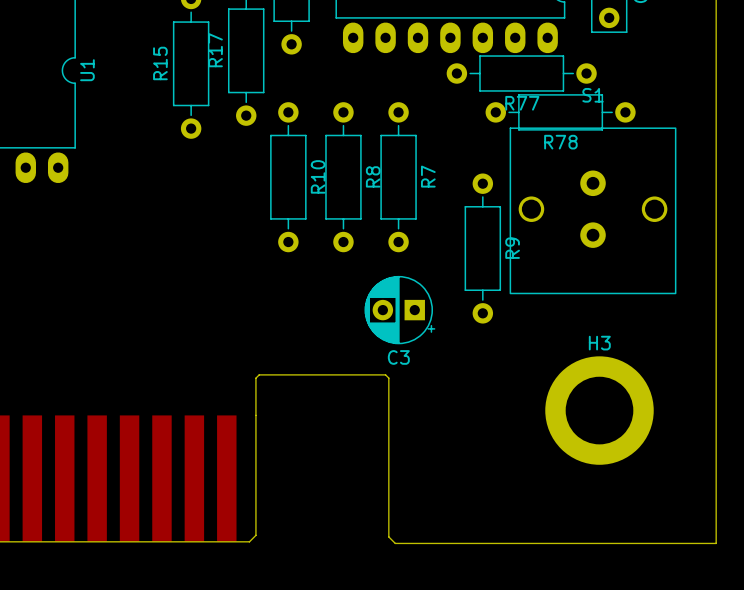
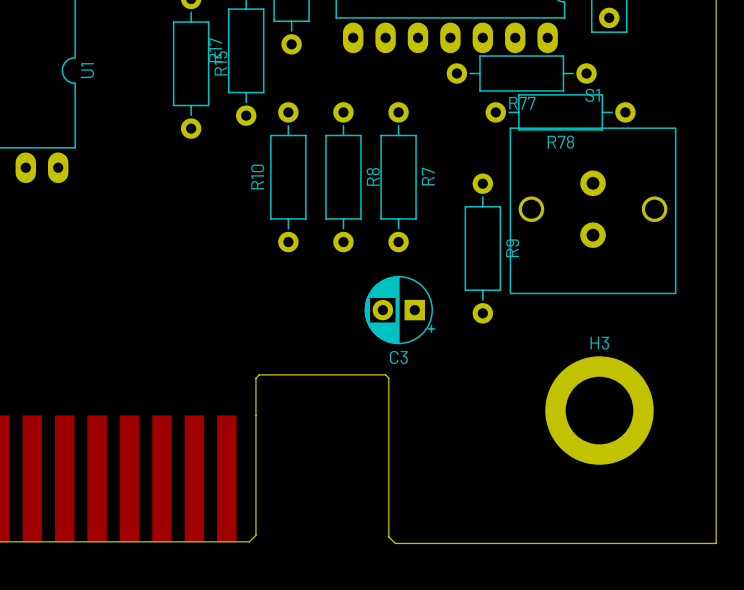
R15 name position: R15 (160, 63) -> R15 (220, 63)
R10 name position: R10 (318, 176) -> R10 (257, 177)

